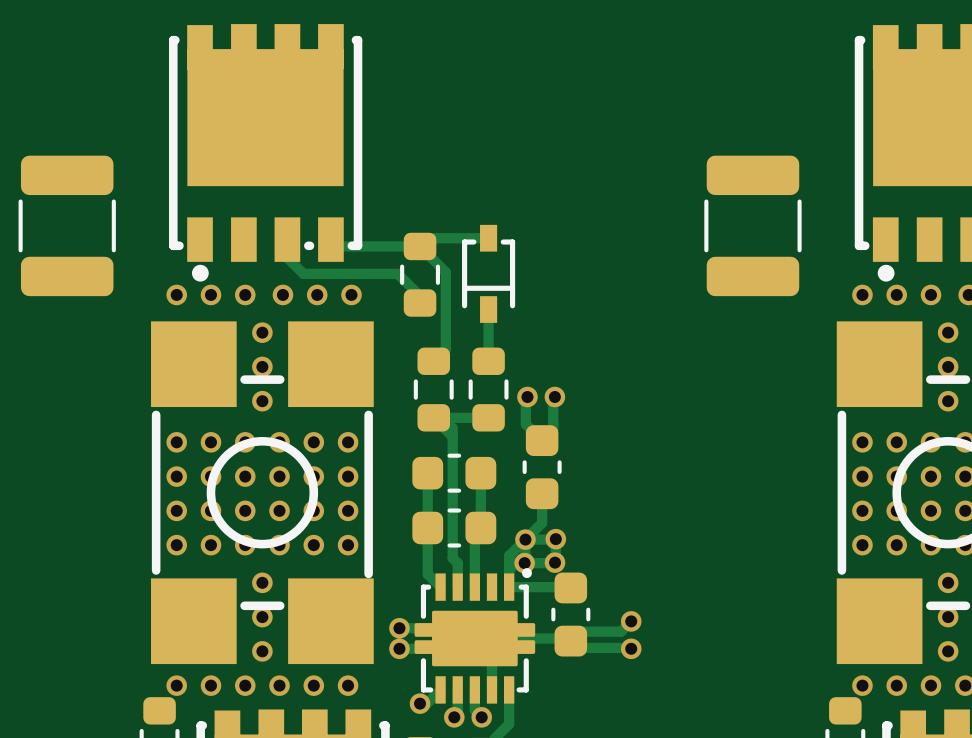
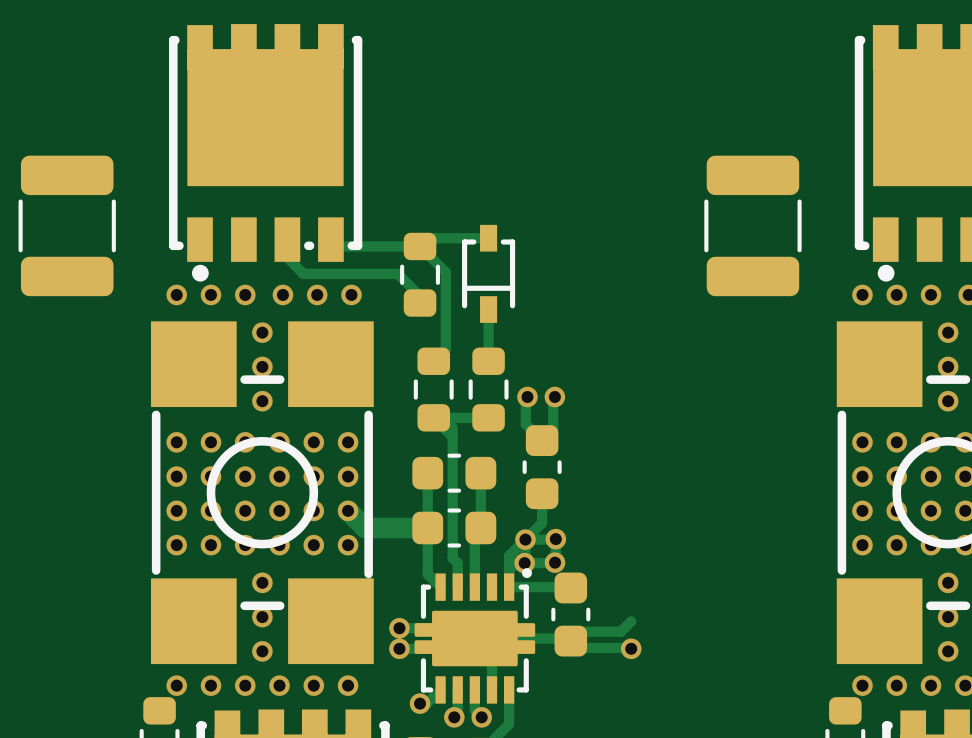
track: none -> (348, 510) (365, 528) (427, 528)
via: (631, 621) -> none

